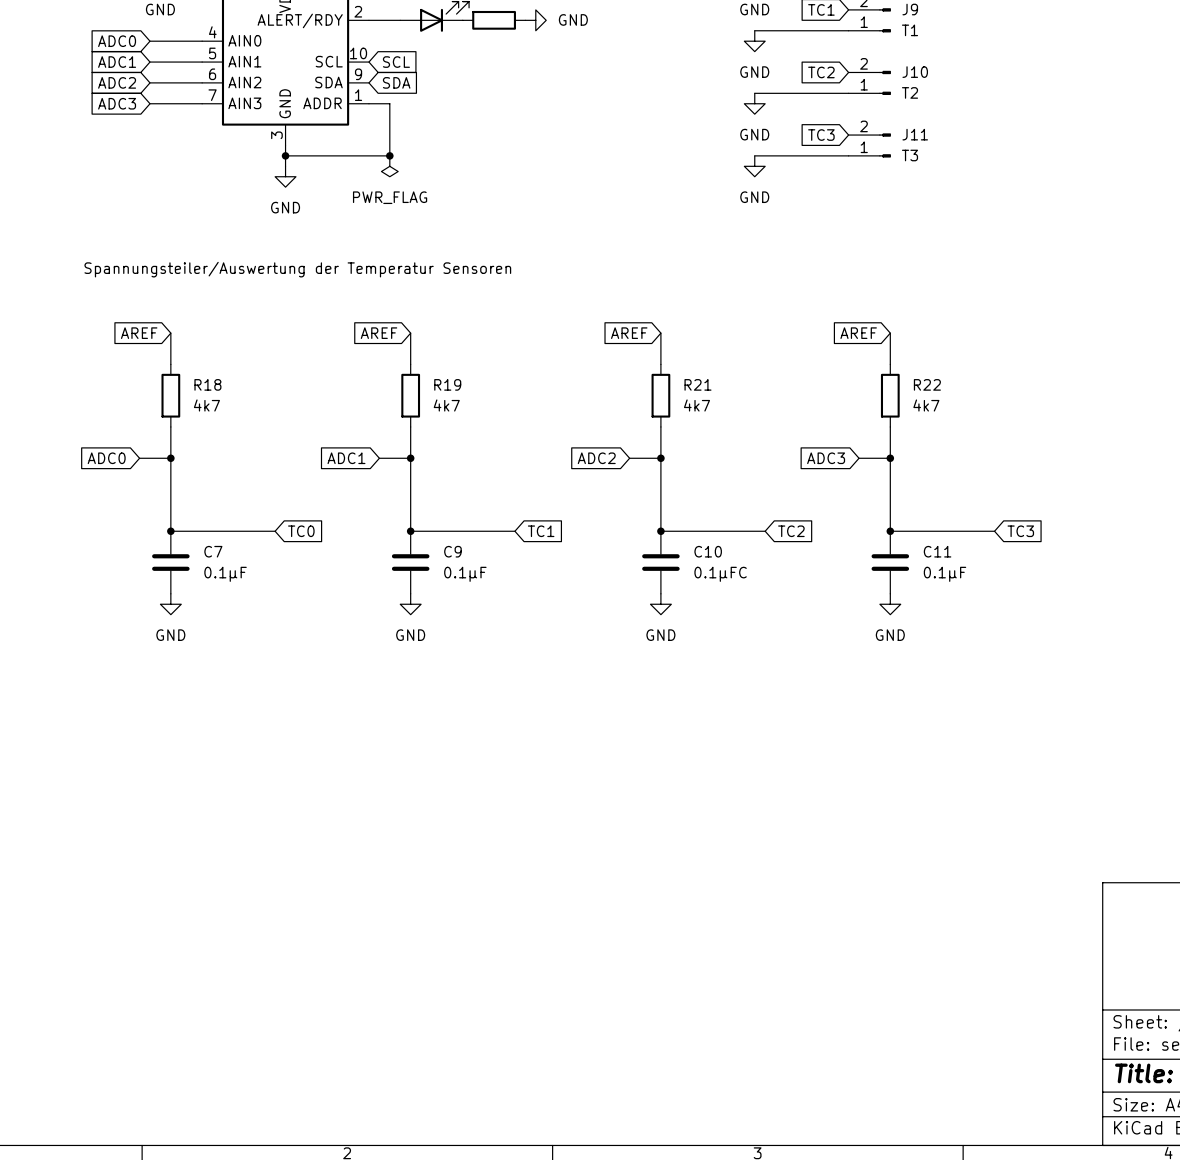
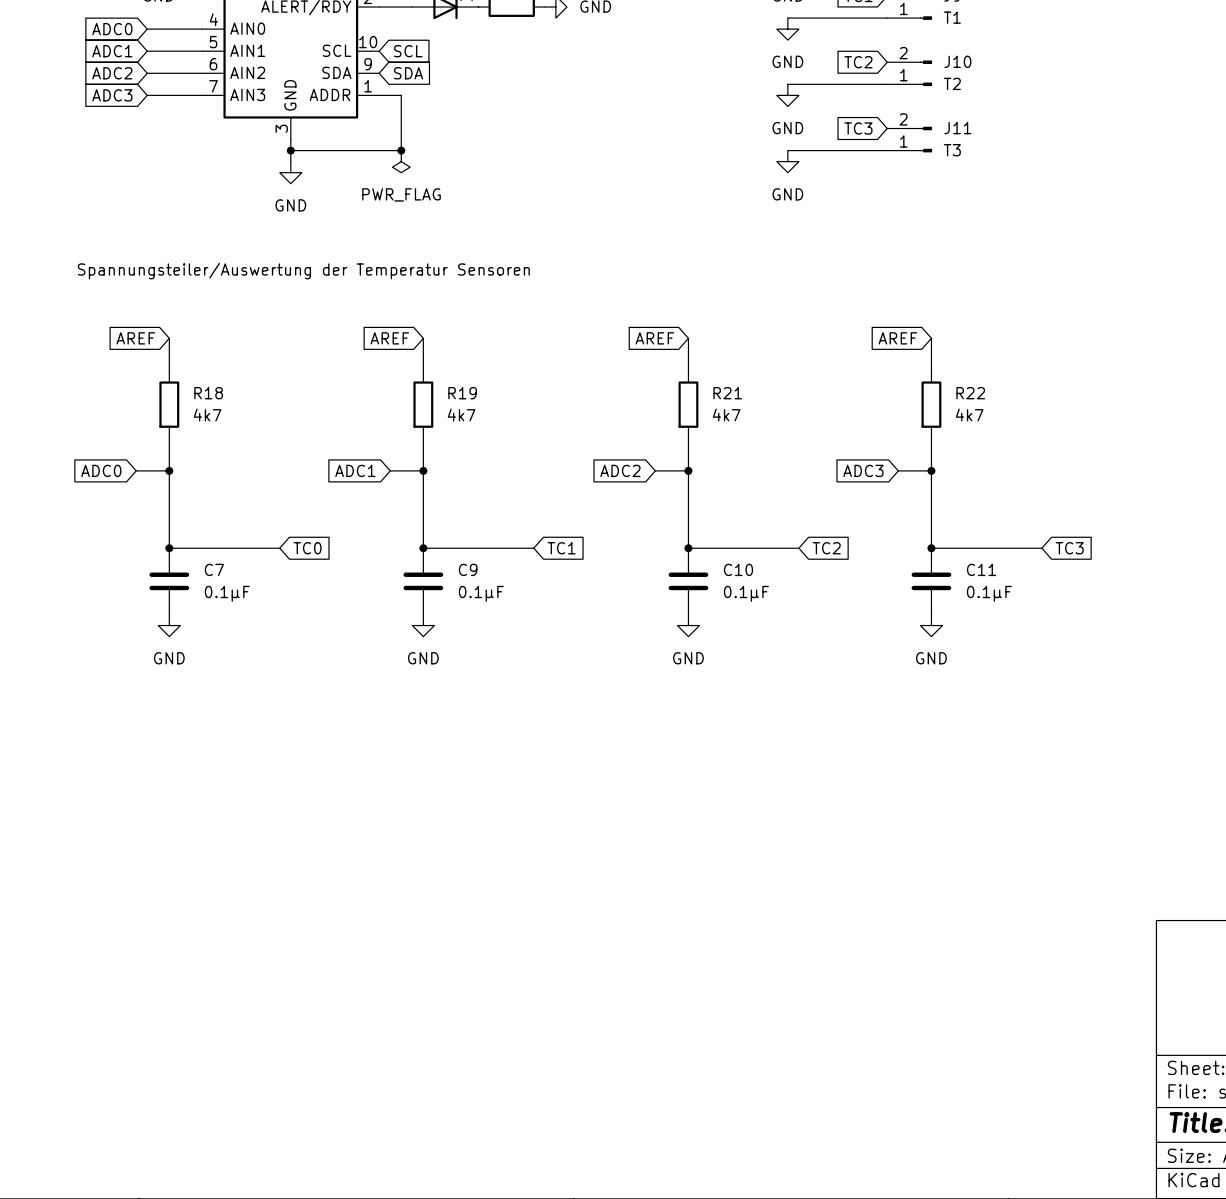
C10 value: 0.1µFC (720, 574) -> 0.1µF (746, 593)

